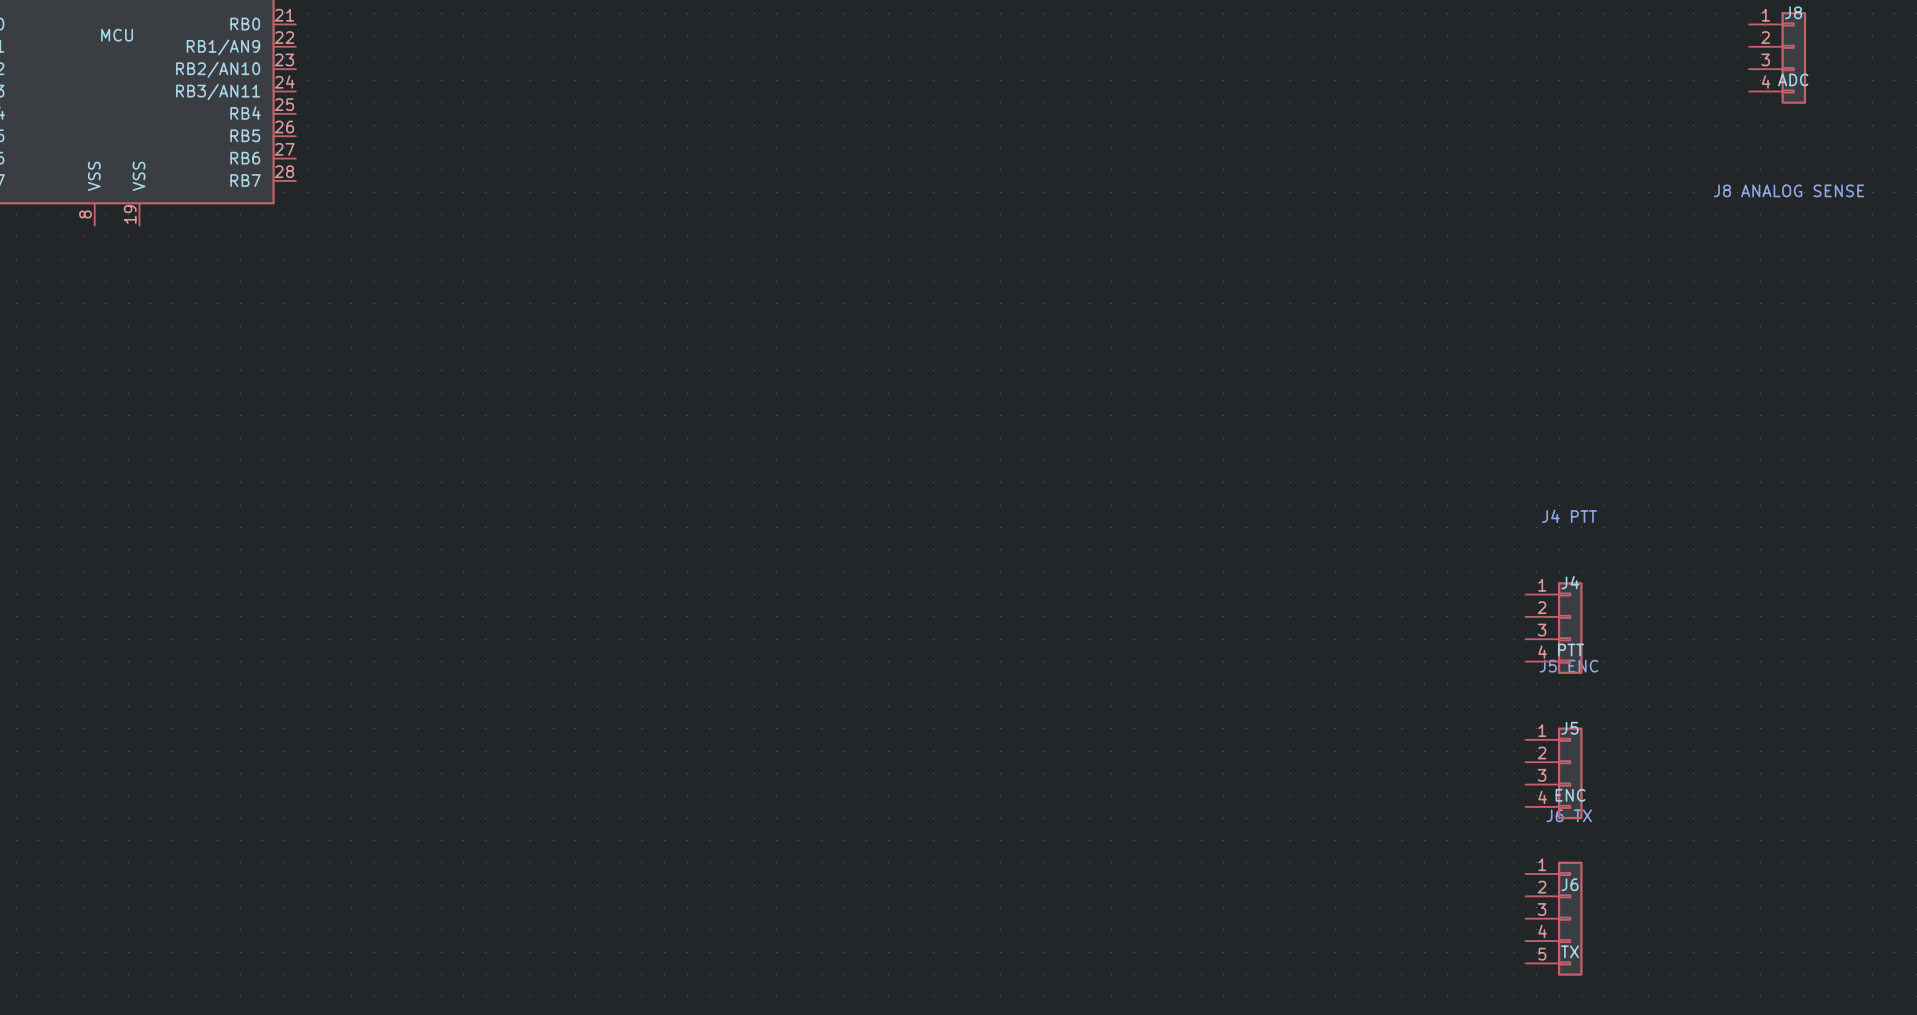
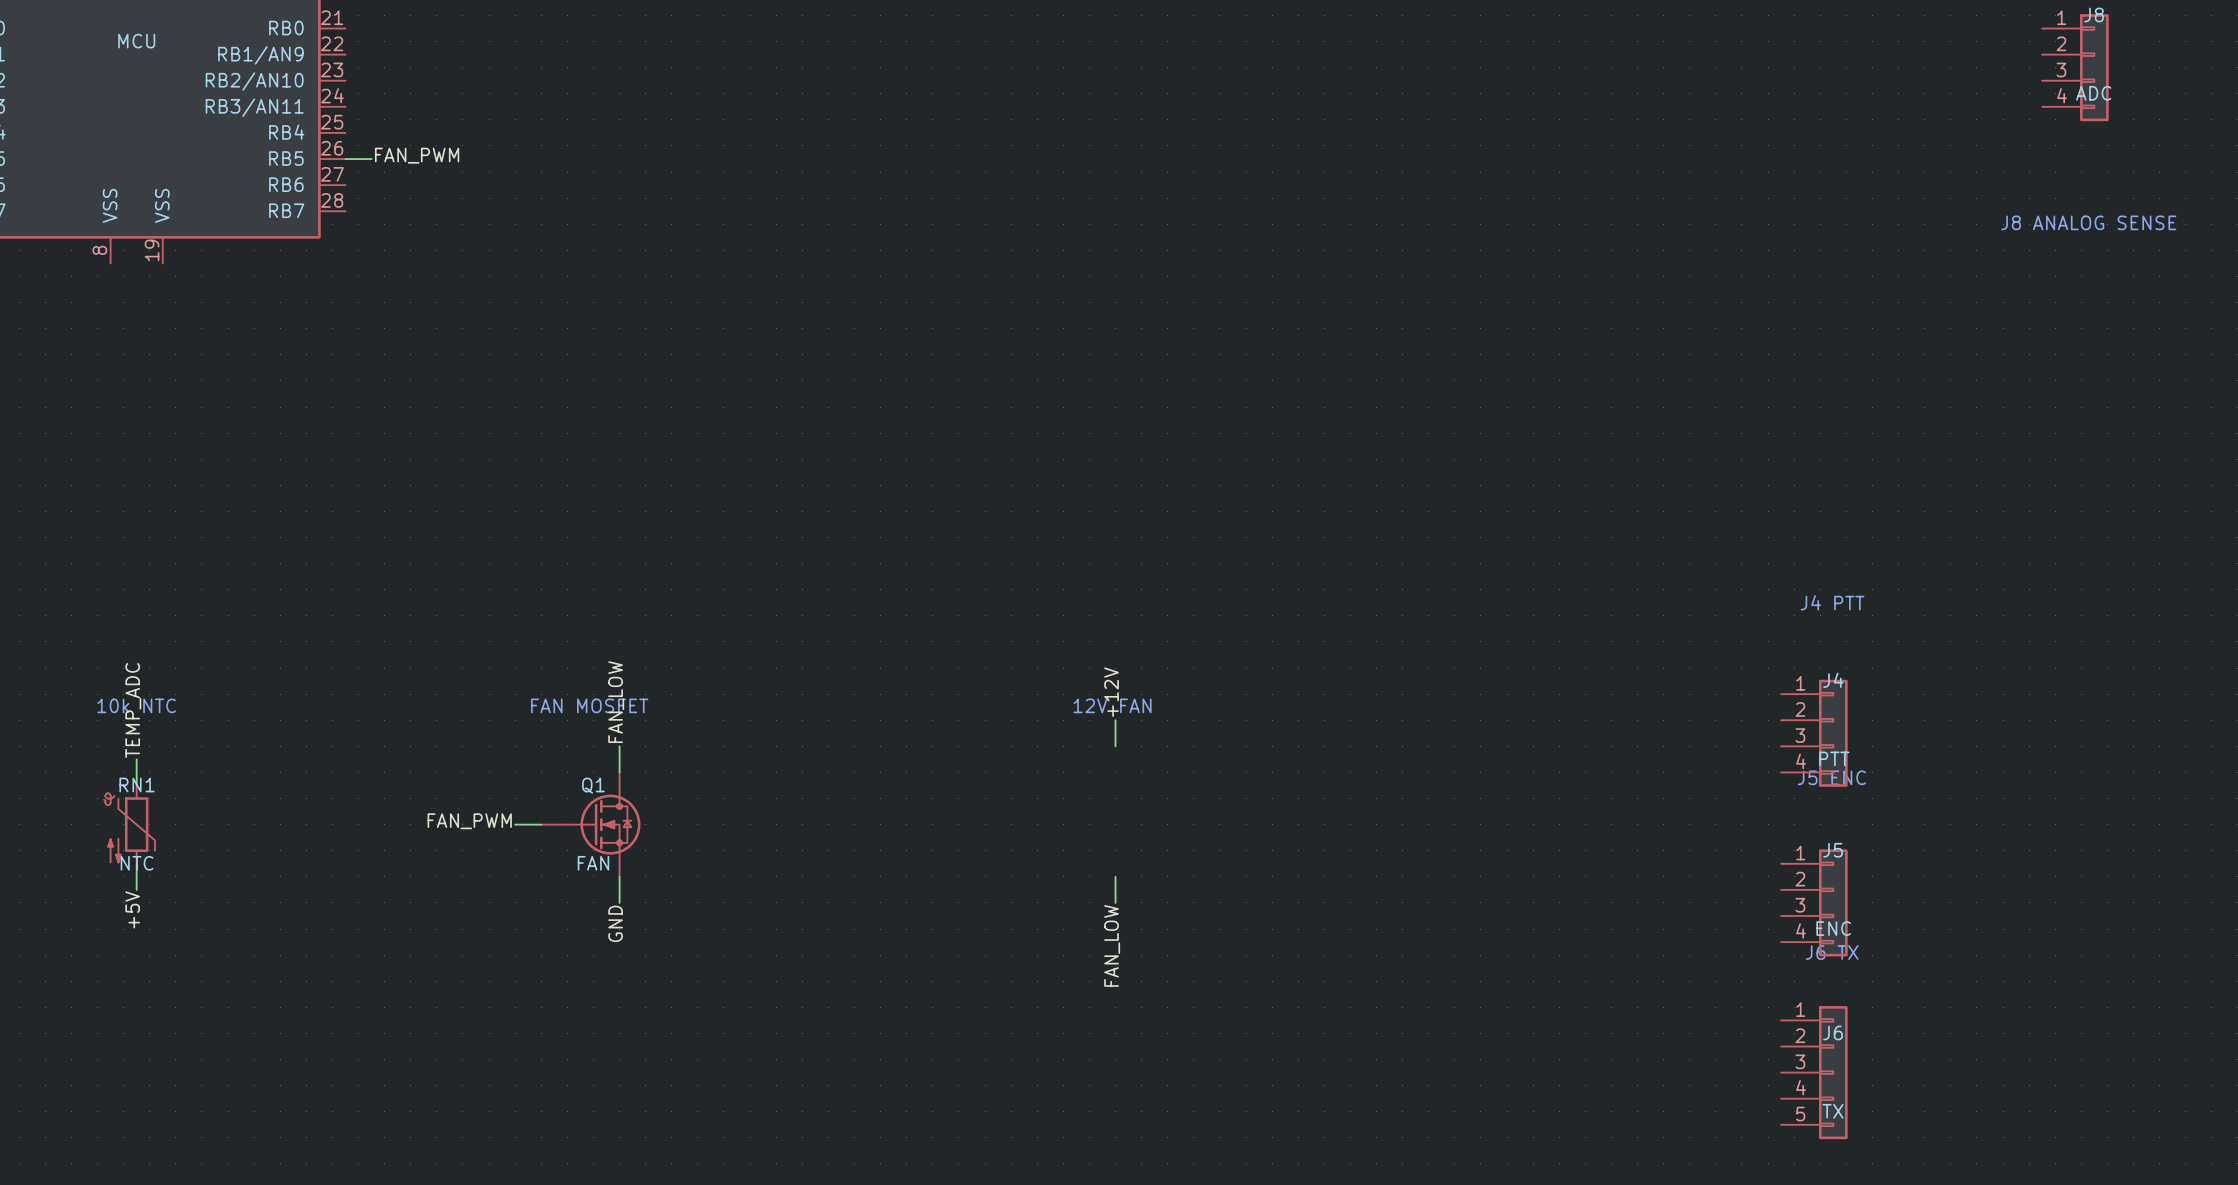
label: none -> FAN_PWM (417, 155)
wire: none -> (345, 159) (371, 159)
label: none -> +12V (1111, 692)
label: none -> FAN_LOW (616, 702)
text: none -> 10k NTC (136, 705)
text: none -> FAN MOSFET (589, 705)
text: none -> 12V FAN (1112, 705)
label: none -> TEMP_ADC (133, 710)
wire: none -> (1115, 720) (1115, 746)
wire: none -> (619, 746) (619, 772)
wire: none -> (136, 759) (136, 785)
label: none -> FAN_PWM (469, 821)
RN1: none -> NTC (129, 824)
wire: none -> (515, 824) (541, 824)
Q1: none -> FAN (590, 824)
wire: none -> (136, 863) (136, 889)
wire: none -> (619, 876) (619, 902)
wire: none -> (1115, 876) (1115, 902)
label: none -> +5V (132, 909)
label: none -> GND (615, 923)
label: none -> FAN_LOW (1112, 945)

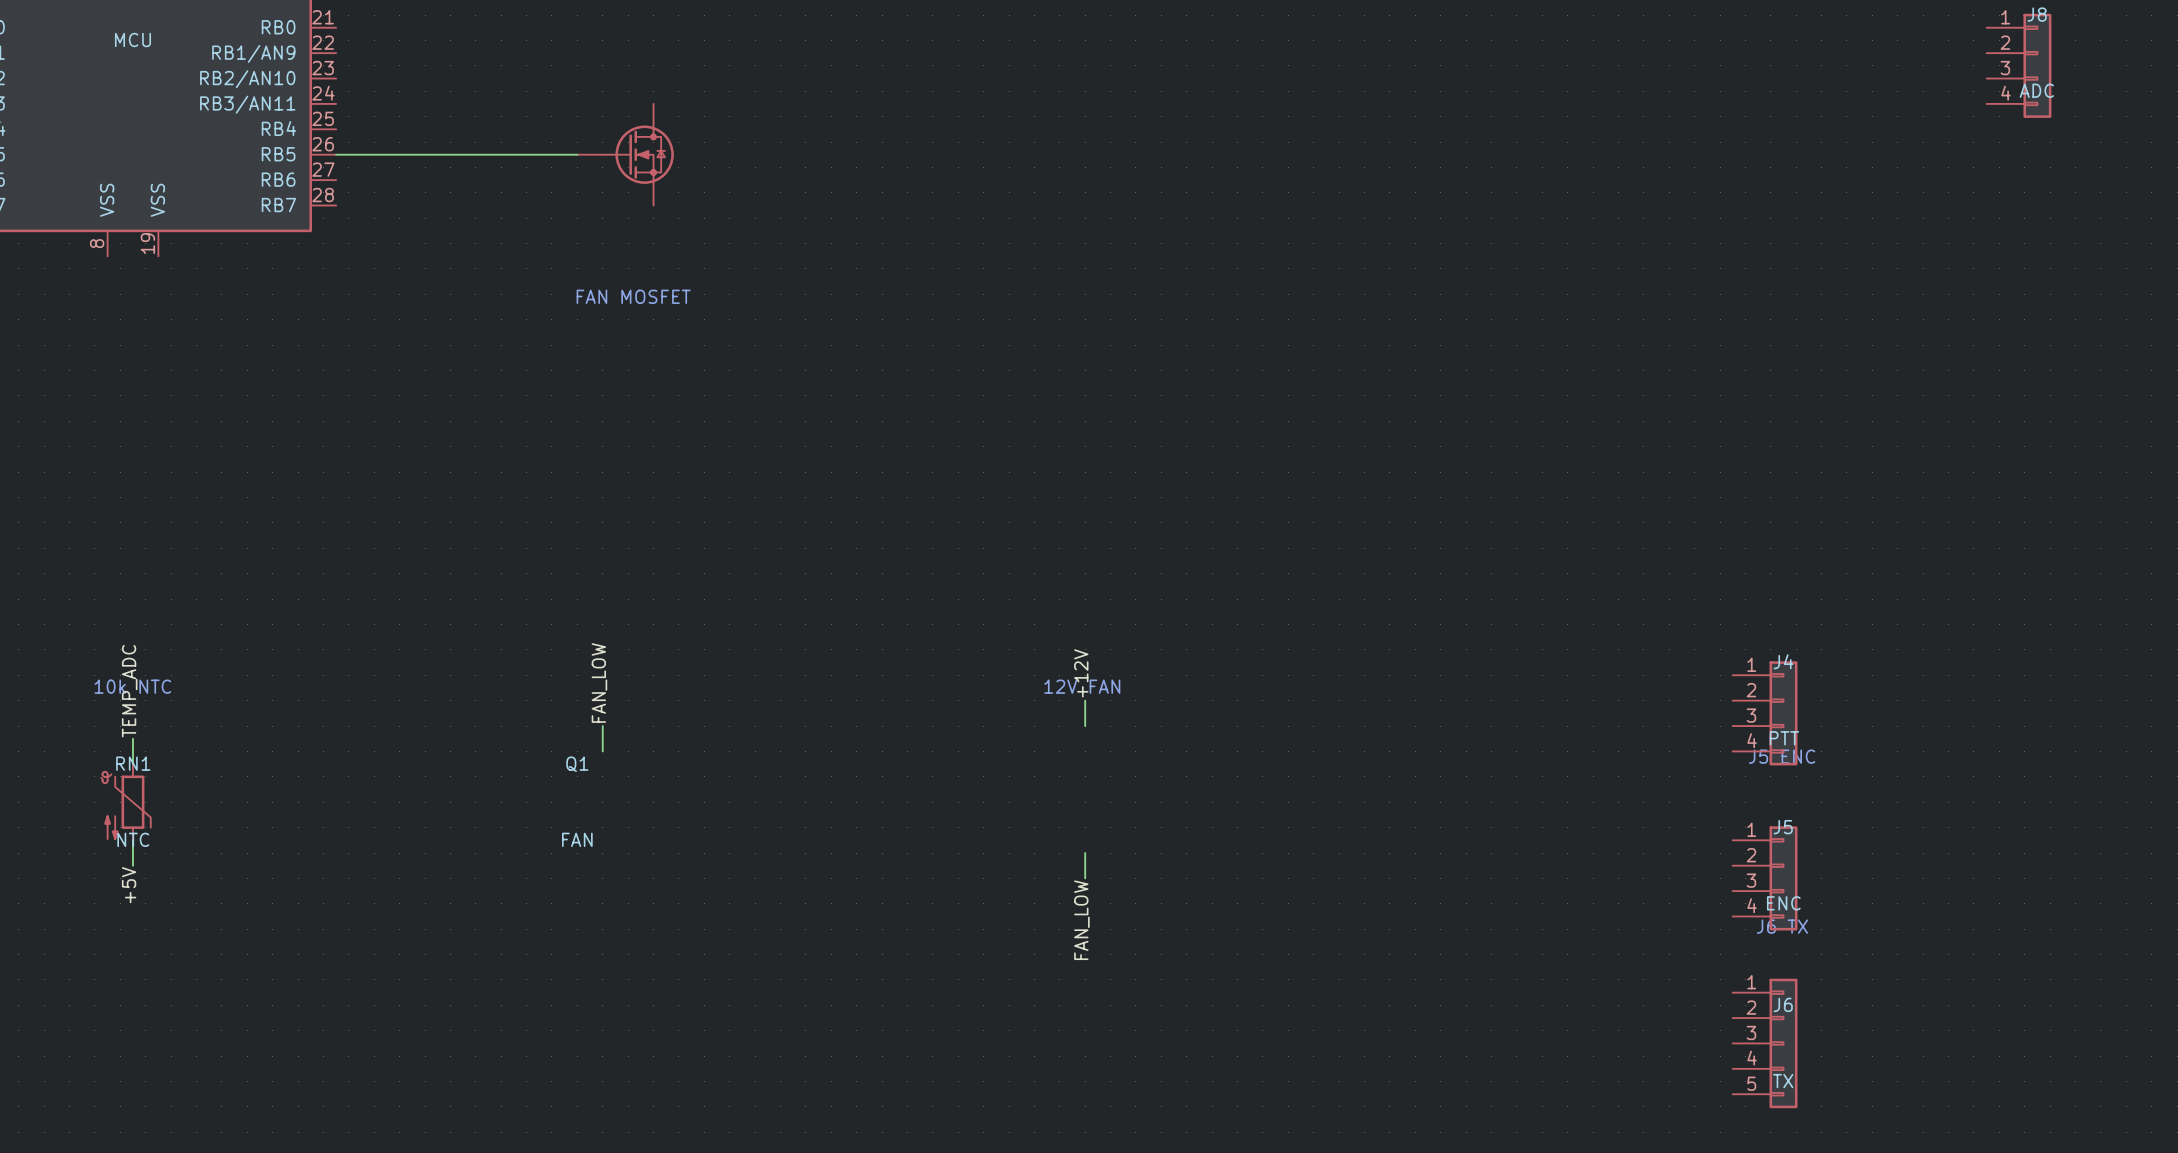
label: FAN_PWM (417, 155) -> none
wire: none -> (361, 154) (577, 154)
text: J8 ANALOG SENSE (2088, 222) -> none
text: none -> FAN MOSFET (633, 296)
text: J4 PTT (1832, 602) -> none
text: FAN MOSFET (589, 705) -> none
label: FAN_PWM (469, 821) -> none
wire: (515, 824) (541, 824) -> none
Q1 position: (590, 824) -> (625, 154)
wire: (619, 876) (619, 902) -> none
label: GND (615, 923) -> none

